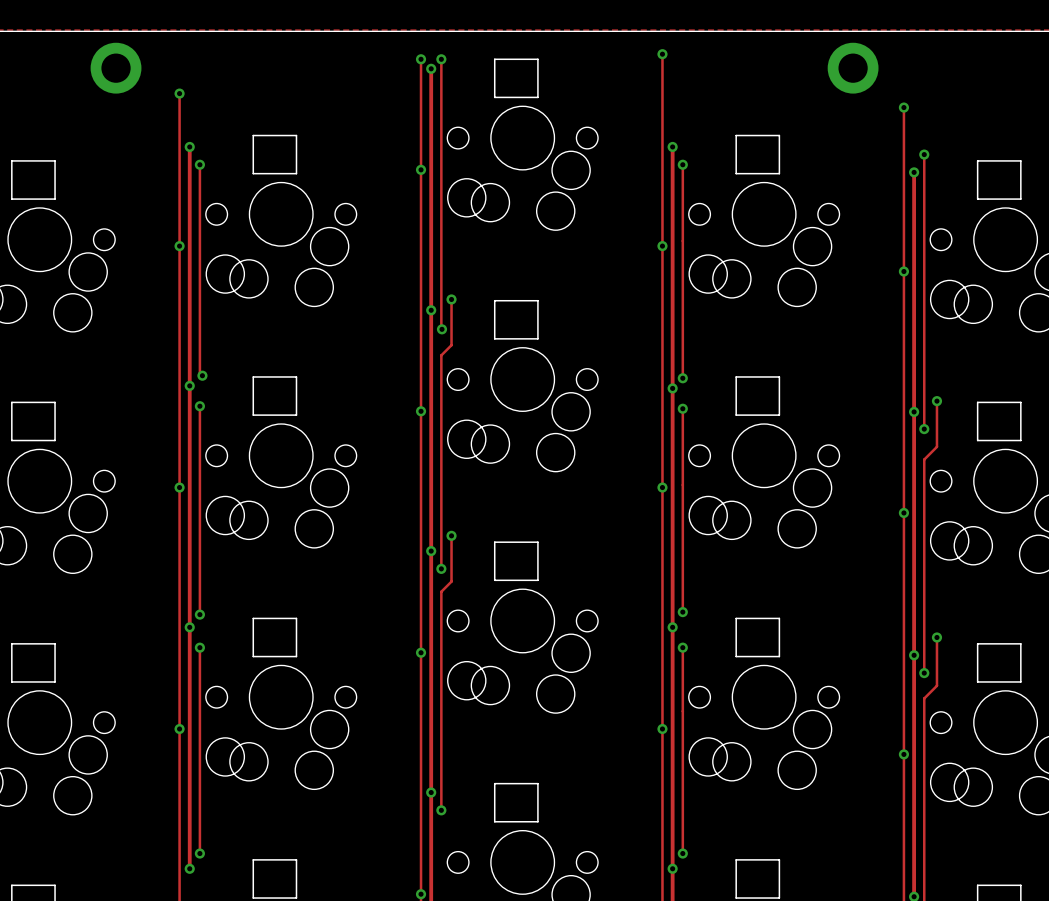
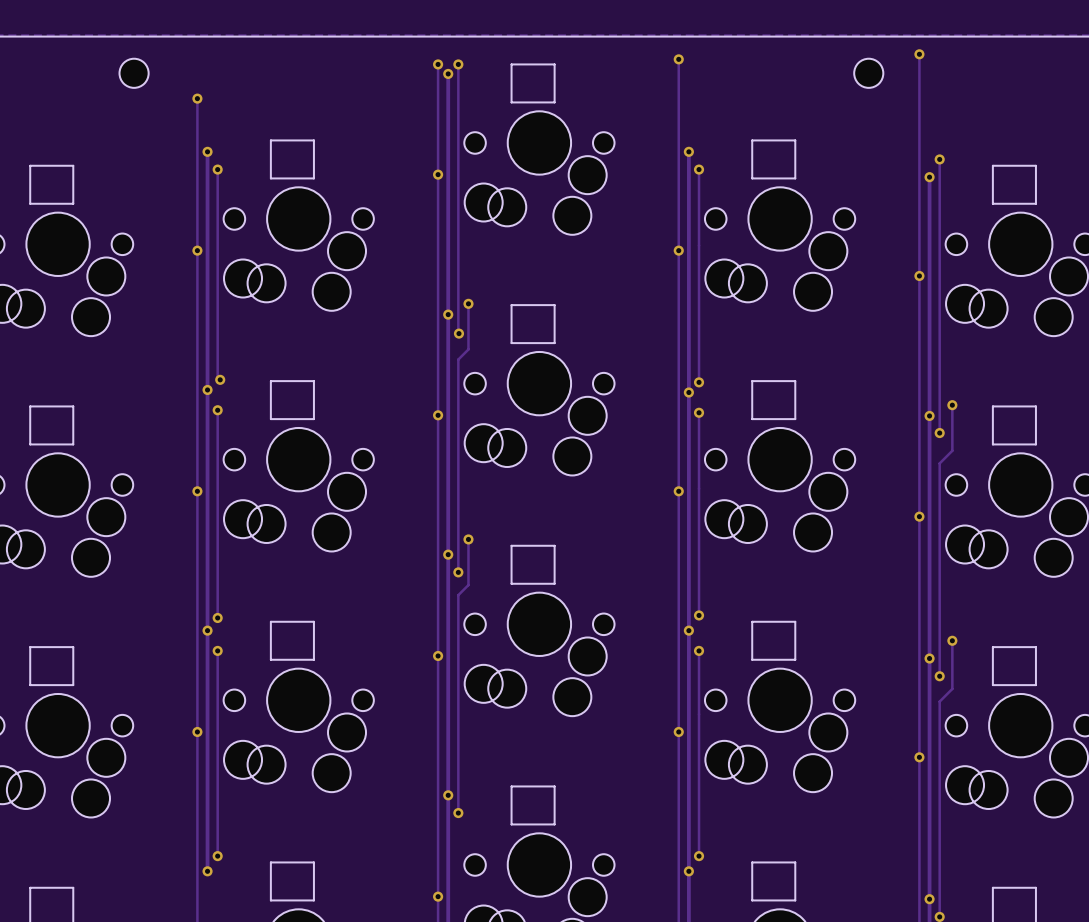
part footprint: [90, 42, 142, 94] -> [119, 58, 149, 88]
part footprint: [827, 42, 879, 94] -> [854, 58, 884, 88]
track: none -> (919, 54) (919, 112)
via position: (903, 107) -> (919, 54)

